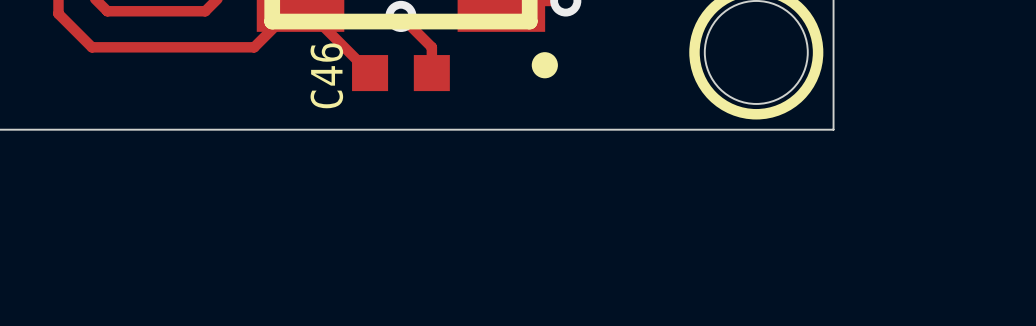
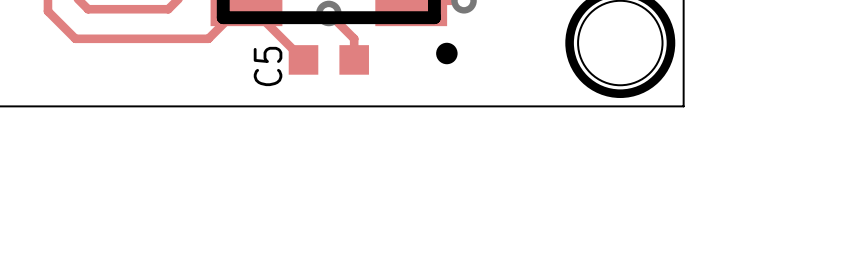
C46 name: C46 (326, 75) -> C5 (268, 66)

